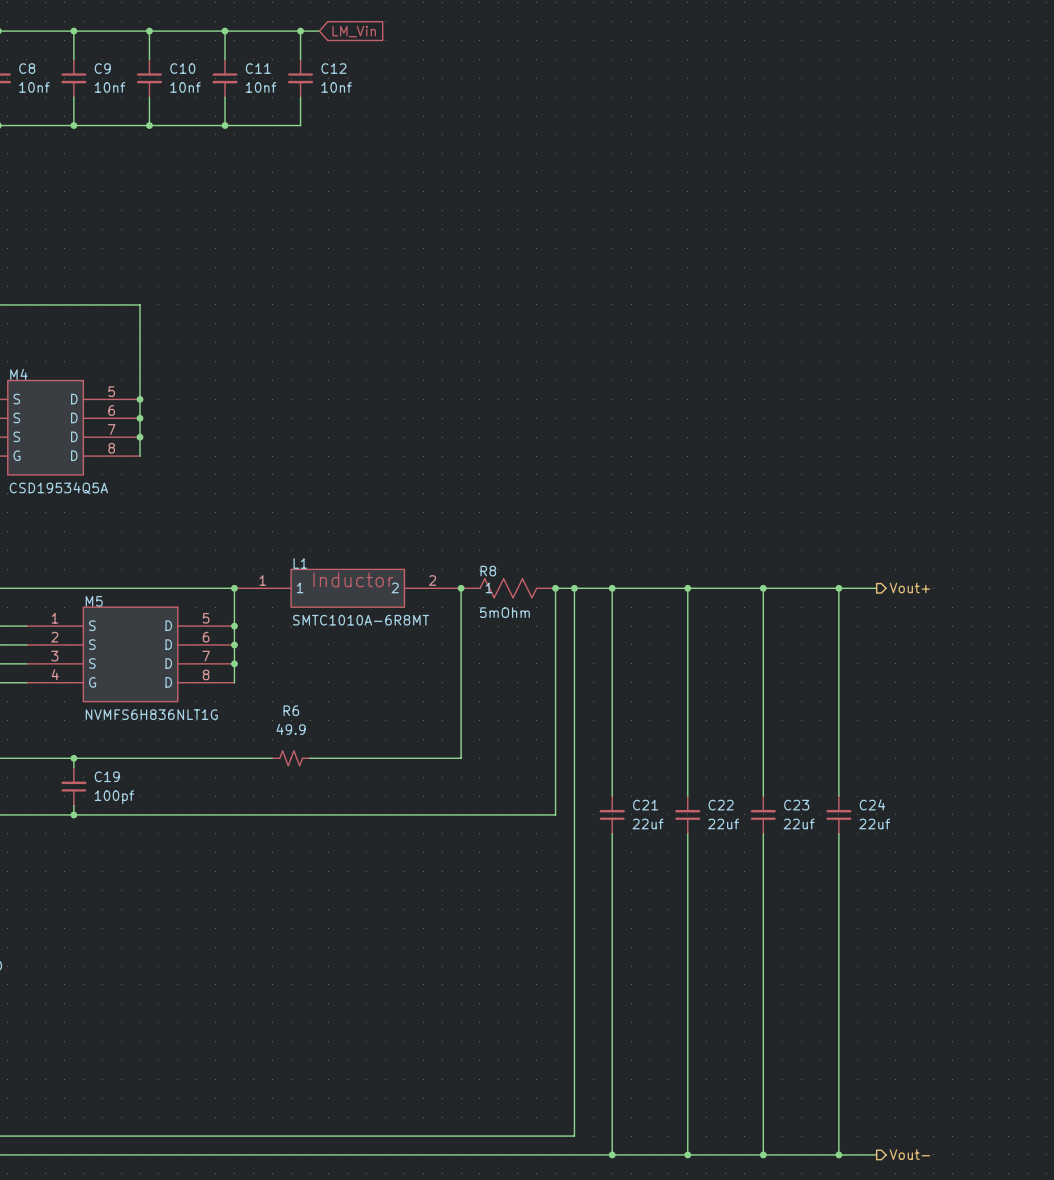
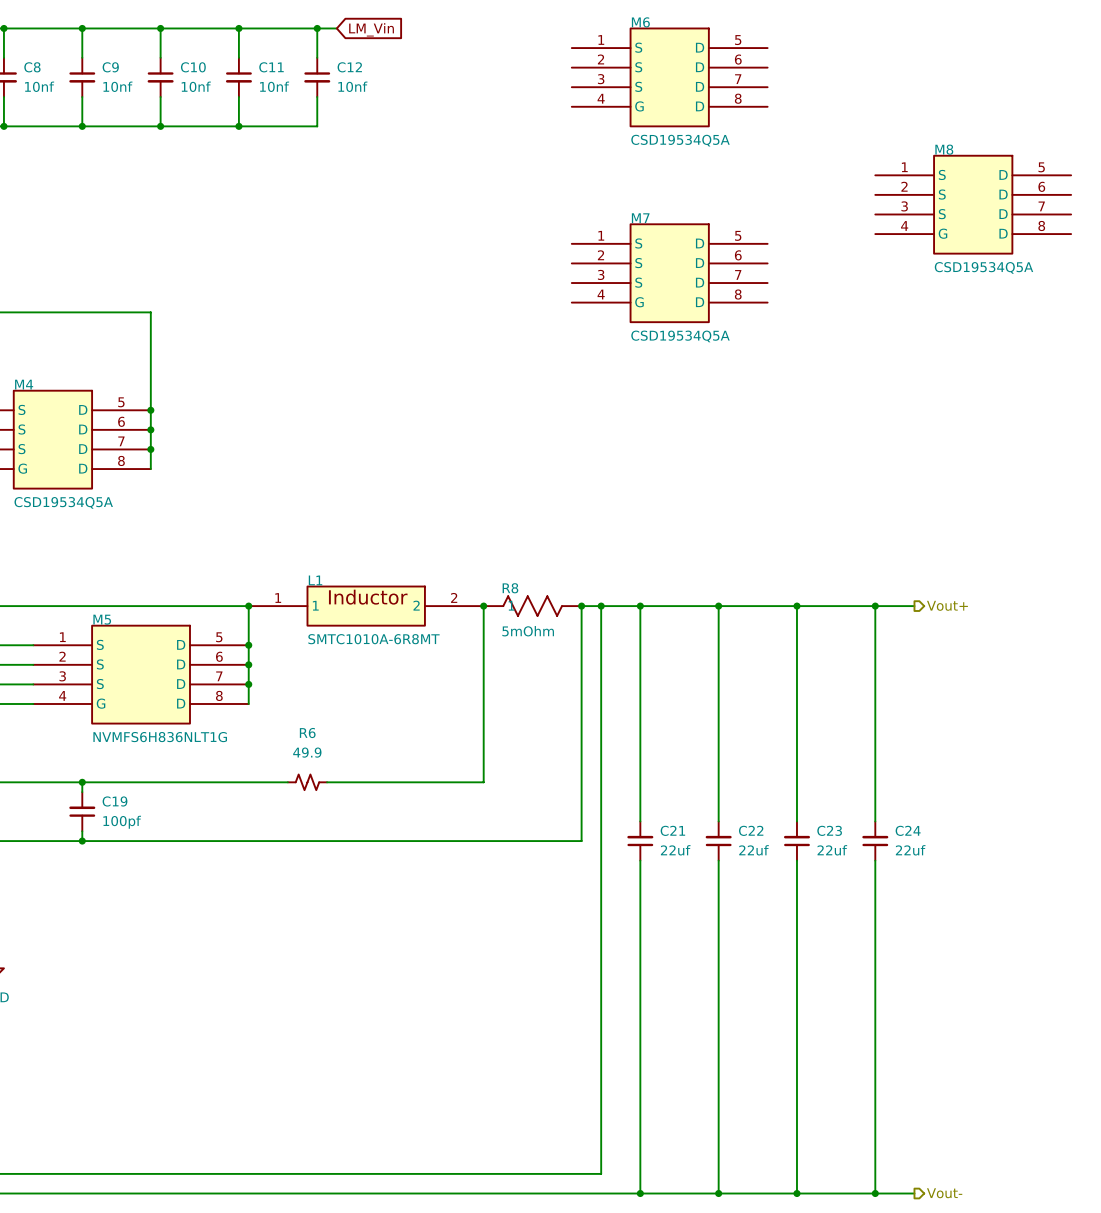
M6: none -> CSD19534Q5A (669, 77)
M8: none -> CSD19534Q5A (973, 204)
M7: none -> CSD19534Q5A (669, 273)

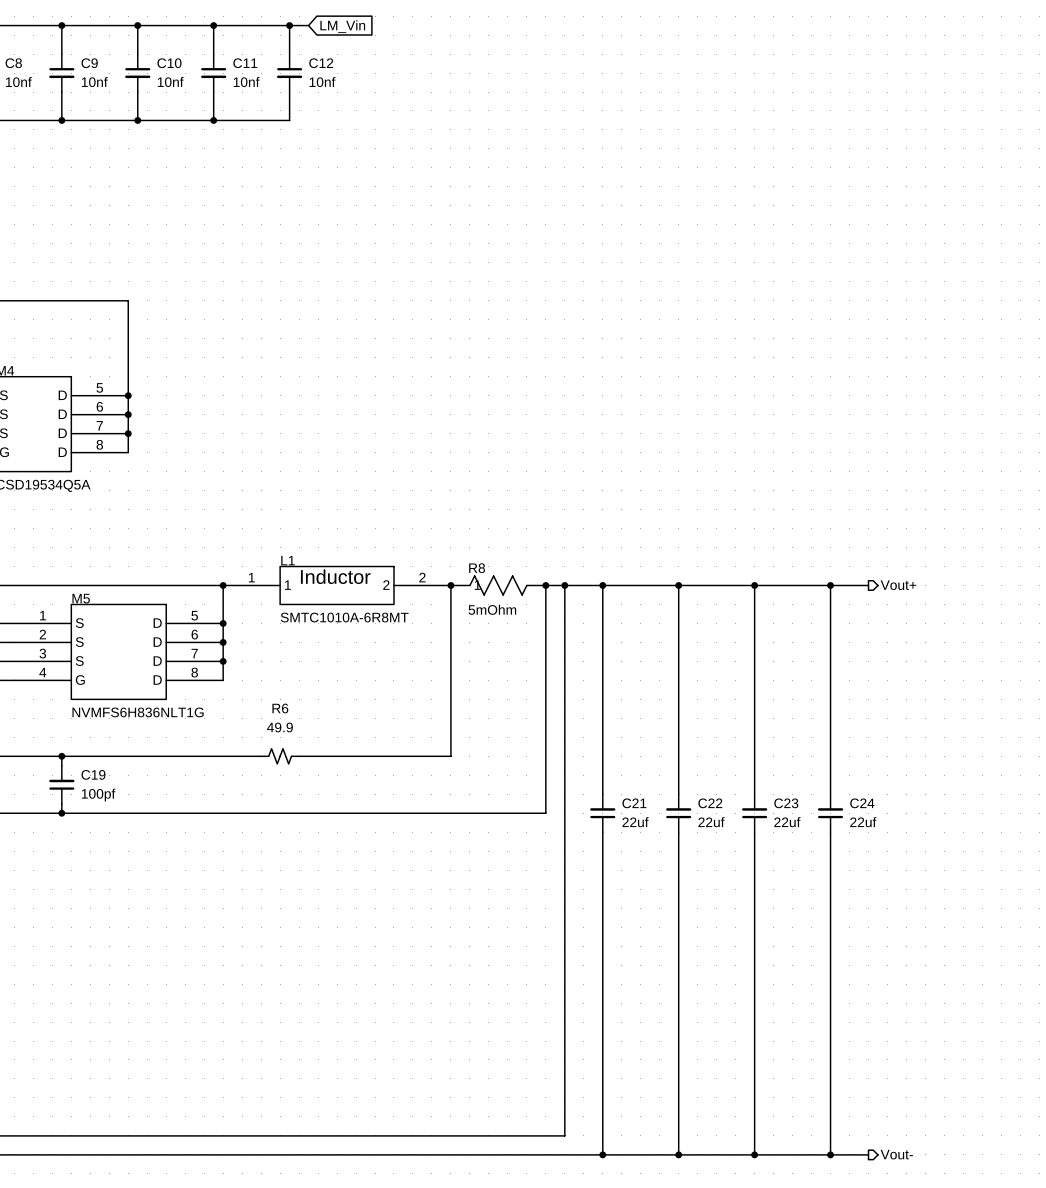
M6: CSD19534Q5A (669, 77) -> none
M8: CSD19534Q5A (973, 204) -> none
M7: CSD19534Q5A (669, 273) -> none

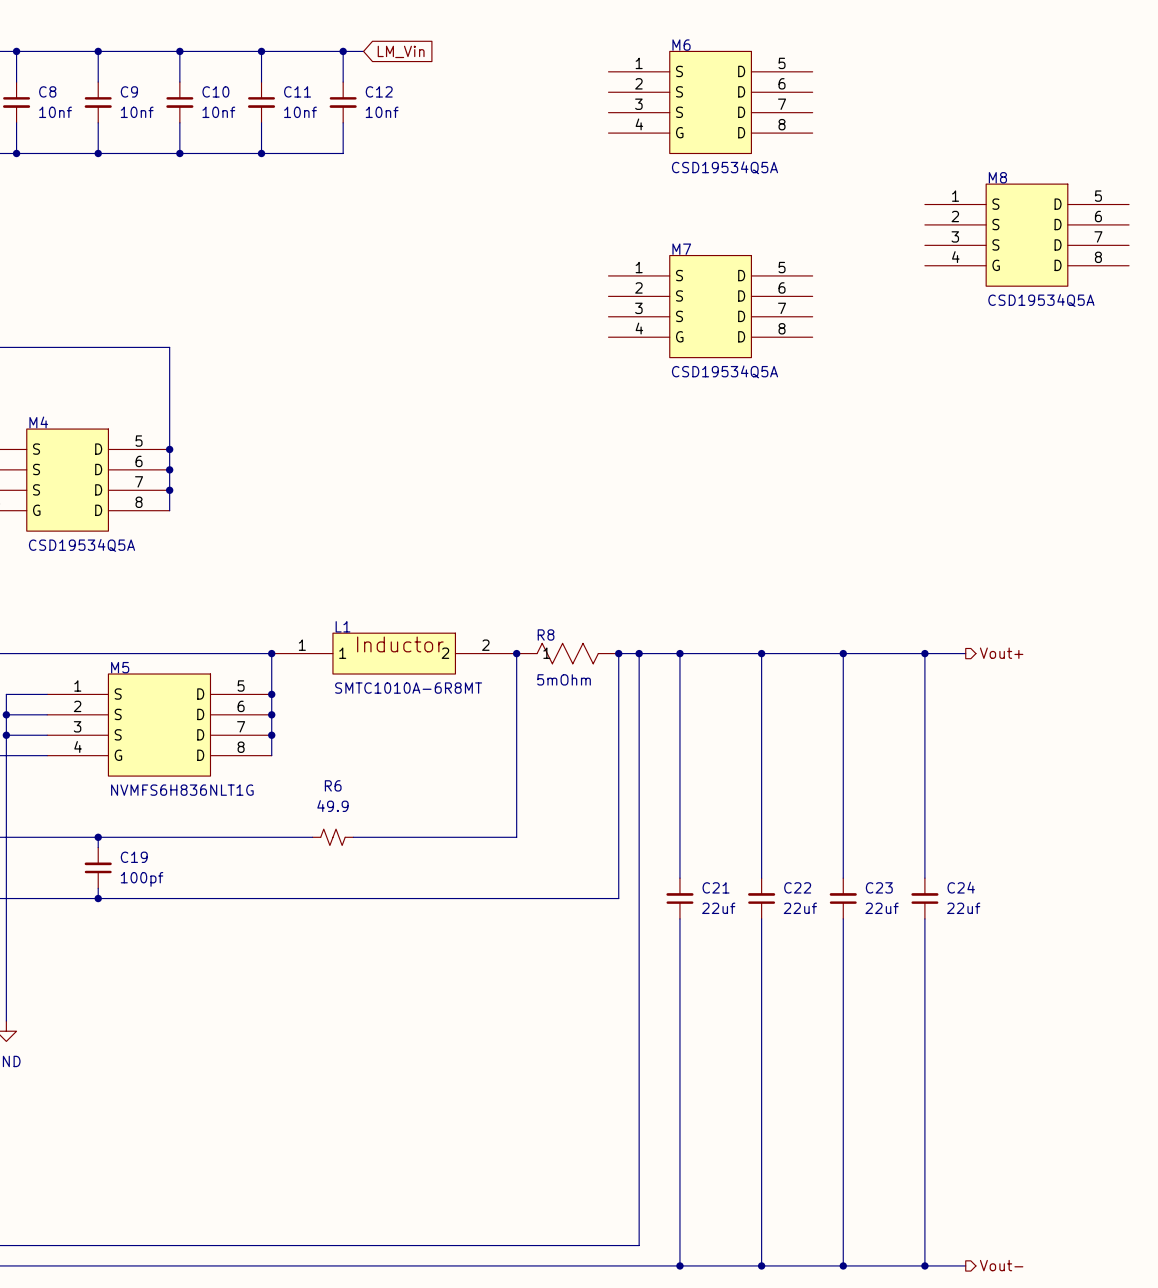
M6: none -> CSD19534Q5A (710, 102)
M8: none -> CSD19534Q5A (1026, 235)
M7: none -> CSD19534Q5A (710, 306)

